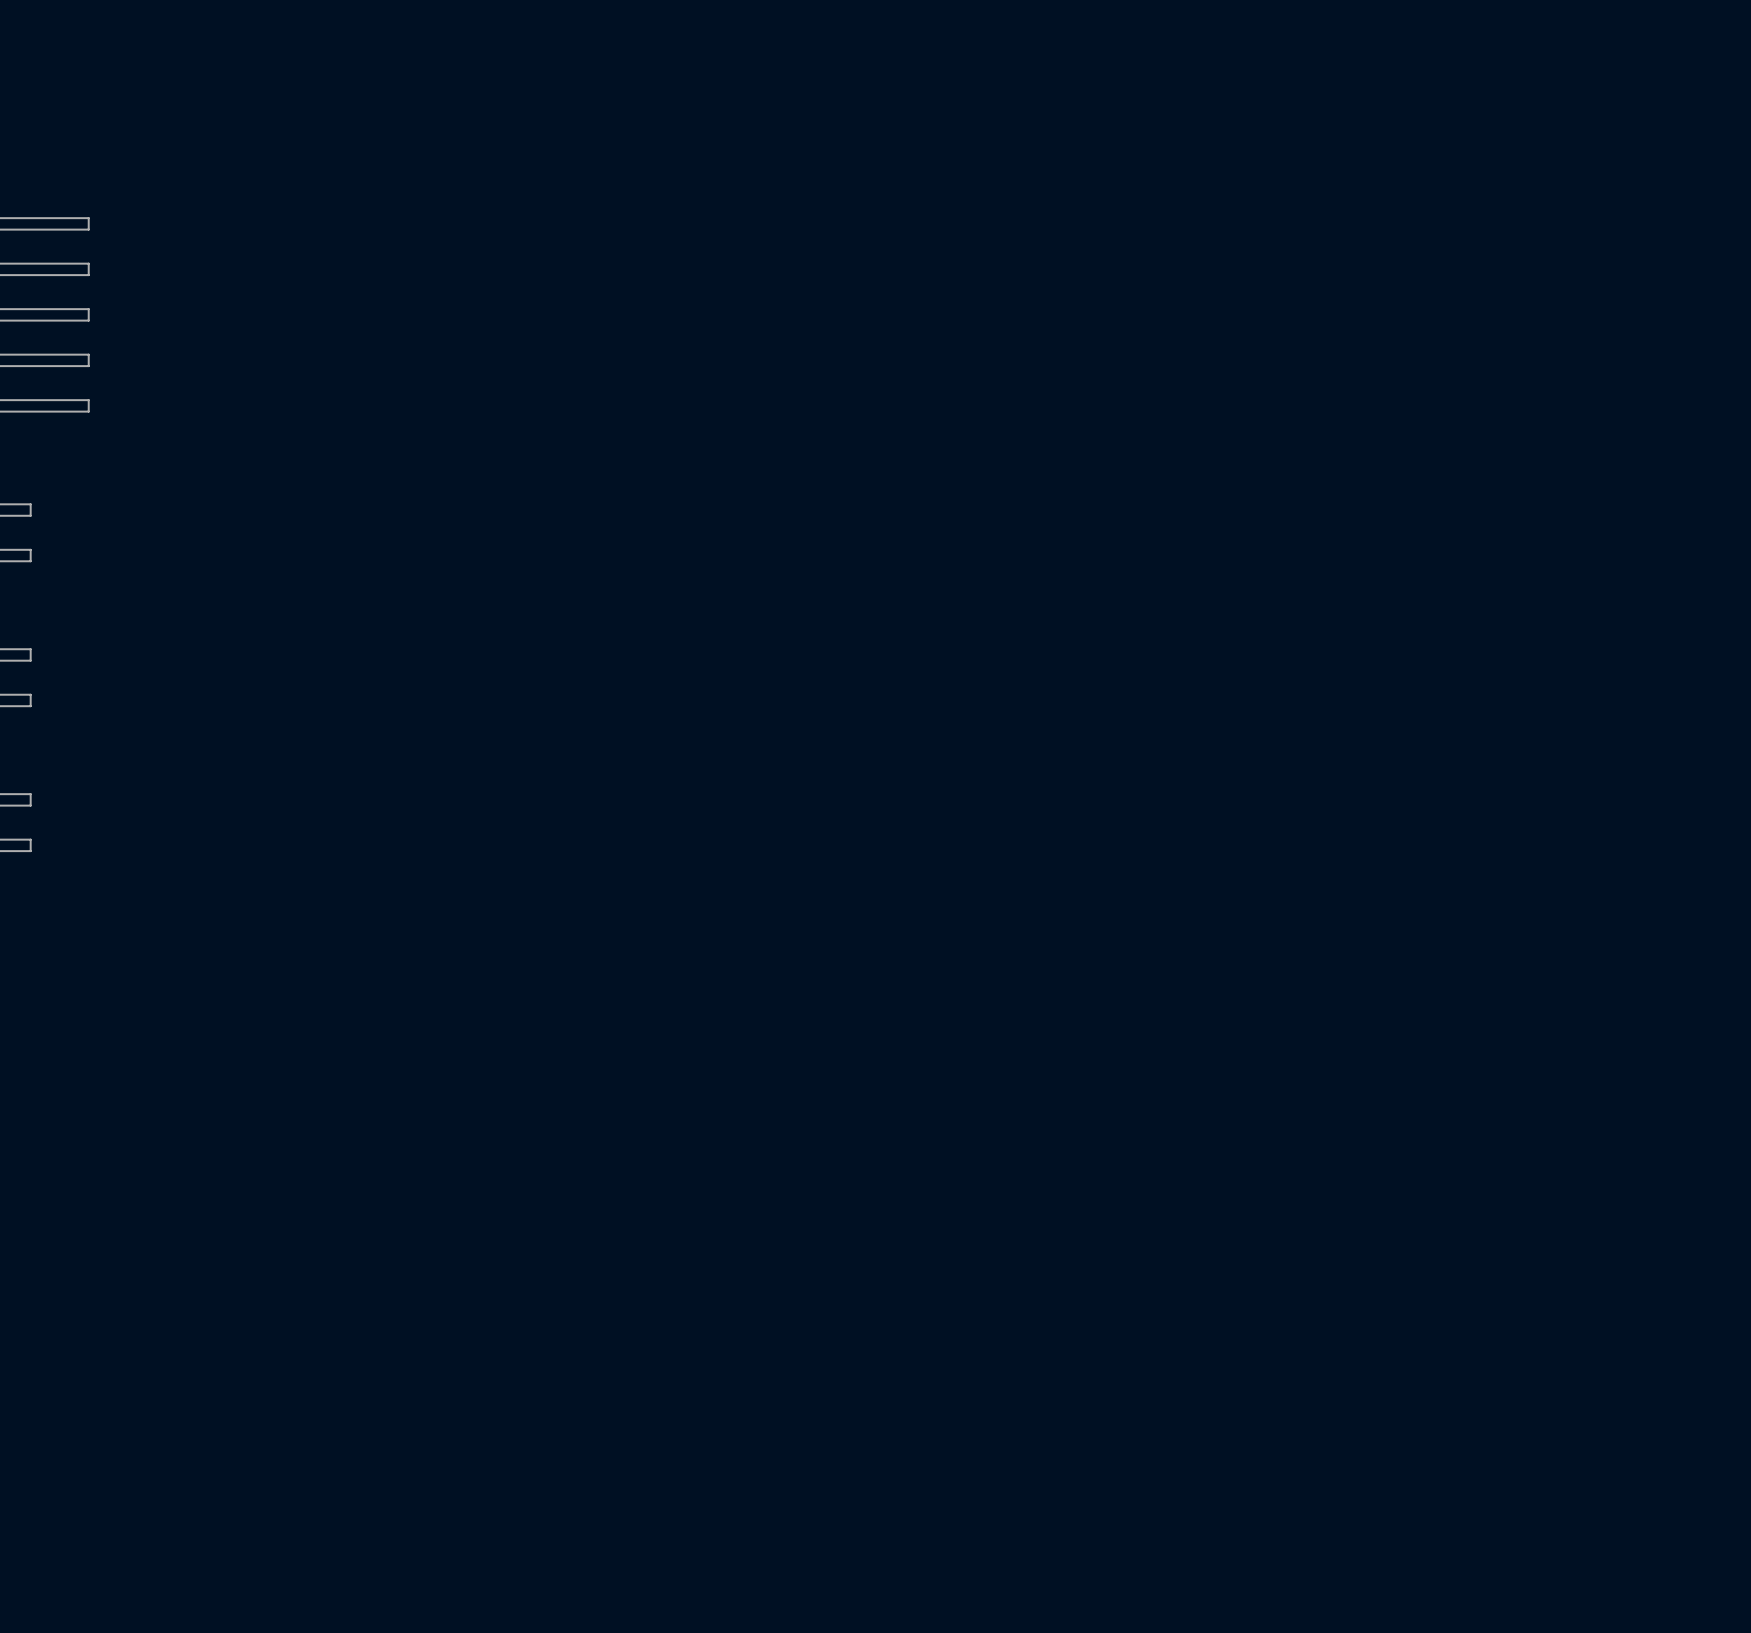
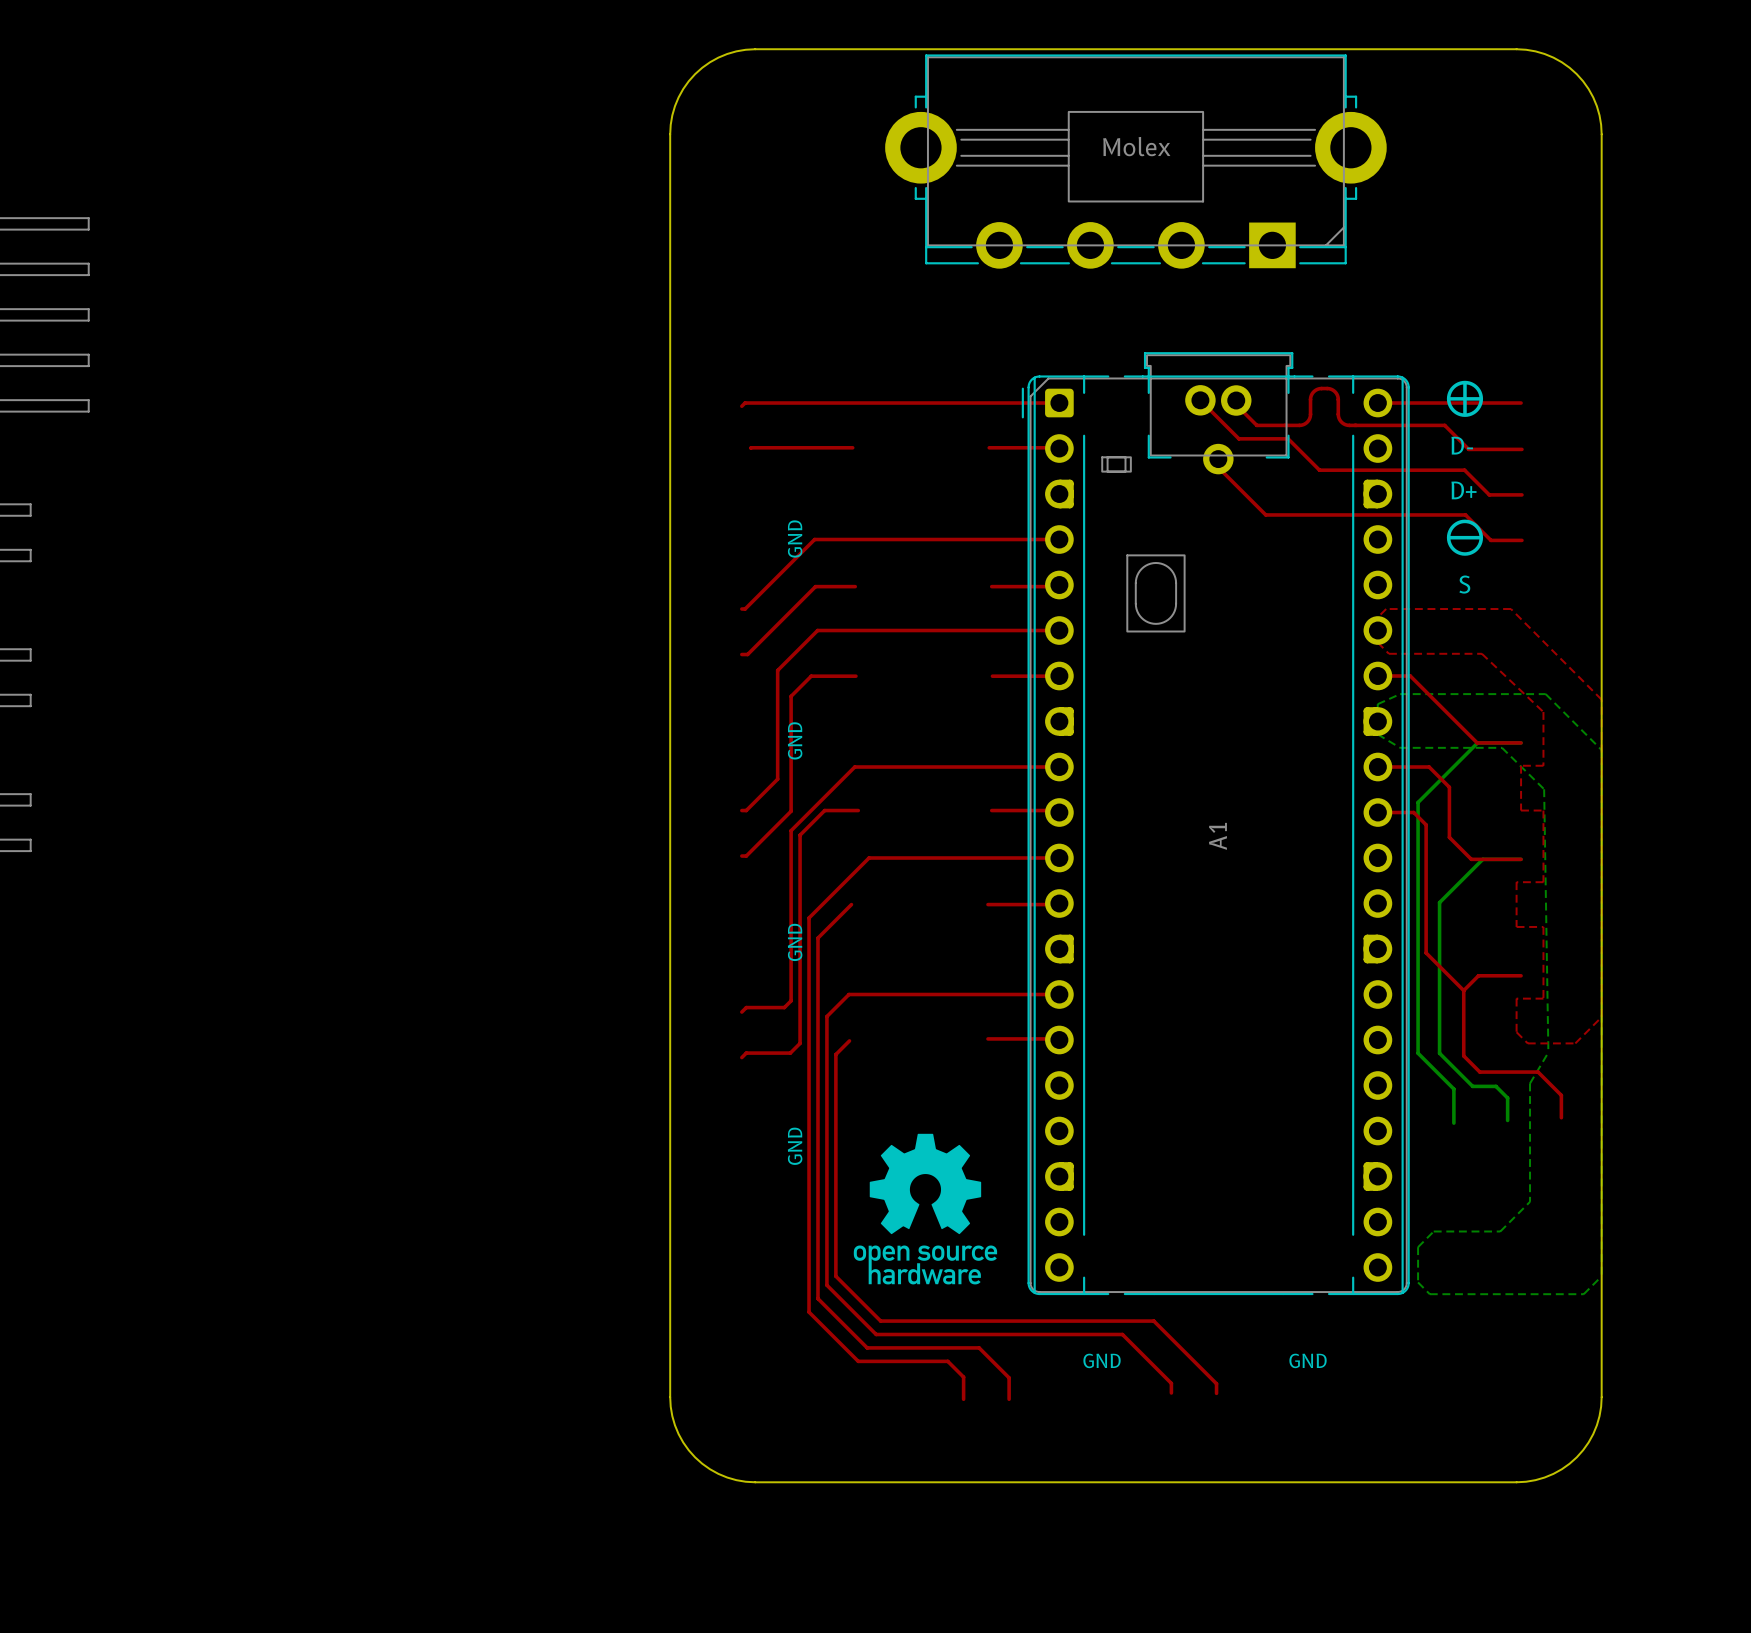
board edge: none -> (755, 49) (1516, 49) (1544, 54) (1561, 62) (1576, 74) (1588, 89) (1596, 106) (1601, 134) (1601, 1397) (1596, 1425) (1588, 1442) (1576, 1457) (1561, 1469) (1535, 1480) (1516, 1482) (755, 1482) (736, 1480) (718, 1473) (702, 1463) (683, 1442) (672, 1416) (670, 1397) (670, 134) (672, 115) (678, 97) (695, 74) (718, 57) (736, 51) (755, 49)
part: none -> (1135, 161)
part: none -> (1200, 400)
part: none -> (1236, 400)
text: none -> ⊕ (1464, 398)
top track: none -> (1055, 403) (745, 403) (741, 406)
top track: none -> (1198, 403) (1203, 403) (1238, 438) (1288, 438) (1319, 470) (1464, 470) (1489, 494) (1521, 494)
top track: none -> (1234, 403) (1256, 425) (1300, 425) (1309, 418) (1310, 398) (1312, 392) (1318, 388) (1328, 388) (1337, 395) (1338, 417) (1346, 425) (1444, 425) (1468, 449) (1521, 449)
top track: none -> (1377, 403) (1521, 403)
text: none -> D- (1462, 445)
top track: none -> (852, 447) (750, 448)
top track: none -> (989, 447) (1059, 448)
part: none -> (1218, 459)
top track: none -> (1216, 465) (1265, 514) (1465, 514) (1490, 540) (1521, 540)
text: none -> D+ (1463, 490)
text: none -> GND (795, 539)
top track: none -> (1059, 539) (814, 539) (745, 609) (741, 609)
text: none -> ⊖ (1464, 537)
text: none -> S (1464, 584)
top track: none -> (1059, 585) (1057, 586) (991, 586)
top track: none -> (855, 586) (815, 586) (747, 654) (741, 654)
top zone outline: none -> (1386, 609) (1510, 609) (1601, 699) (1601, 1017) (1575, 1043) (1527, 1043) (1516, 1032) (1516, 998) (1543, 998) (1543, 926) (1516, 926) (1516, 882) (1543, 882) (1543, 810) (1521, 810) (1521, 765) (1543, 765) (1543, 712) (1481, 653) (1388, 653) (1377, 642) (1377, 617) (1386, 609)
top track: none -> (1055, 630) (817, 630) (777, 670) (777, 779) (746, 810) (741, 810)
top track: none -> (855, 676) (811, 676) (791, 696) (791, 811) (746, 856) (741, 856)
top track: none -> (992, 676) (1059, 676)
top track: none -> (1377, 676) (1410, 676) (1477, 742) (1521, 742)
bottom zone outline: none -> (1400, 694) (1545, 694) (1601, 750) (1601, 1276) (1583, 1294) (1429, 1294) (1418, 1282) (1418, 1247) (1433, 1231) (1500, 1231) (1530, 1201) (1530, 1083) (1548, 1052) (1544, 789) (1502, 747) (1400, 747) (1377, 734) (1377, 704) (1400, 694)
text: none -> GND (795, 740)
bottom track: none -> (1521, 742) (1477, 742) (1418, 802) (1418, 1053) (1453, 1089) (1453, 1123)
top track: none -> (1055, 767) (854, 767) (791, 830) (791, 1000) (784, 1007) (746, 1007) (741, 1012)
top track: none -> (1377, 767) (1429, 767) (1449, 787) (1449, 837) (1471, 859) (1521, 859)
top track: none -> (858, 810) (824, 810) (800, 835) (800, 1043) (790, 1053) (746, 1053) (741, 1057)
top track: none -> (991, 810) (1057, 810)
top track: none -> (1377, 812) (1413, 812) (1426, 824) (1426, 952) (1463, 990)
A1: none -> (1215, 823)
top track: none -> (1055, 858) (869, 858) (809, 918) (809, 1312) (858, 1361) (947, 1361) (963, 1377) (963, 1399)
bottom track: none -> (1521, 859) (1482, 859) (1439, 902) (1439, 1053) (1472, 1086) (1495, 1086) (1507, 1098) (1507, 1120)
top track: none -> (851, 904) (817, 938) (817, 1298) (867, 1347) (979, 1347) (1009, 1377) (1009, 1399)
top track: none -> (987, 904) (1058, 904)
text: none -> GND (795, 942)
top track: none -> (1521, 975) (1478, 975) (1463, 990)
top track: none -> (1463, 990) (1463, 1055) (1479, 1072) (1538, 1072) (1561, 1095) (1561, 1117)
top track: none -> (1059, 994) (848, 994) (826, 1016) (826, 1285) (876, 1334) (1122, 1334) (1171, 1383) (1171, 1392)
top track: none -> (987, 1038) (1058, 1038)
top track: none -> (849, 1040) (835, 1054) (835, 1276) (880, 1321) (1153, 1321) (1216, 1383) (1216, 1393)
drawing: none -> [853, 1133, 998, 1285]
text: none -> GND (795, 1146)
text: none -> GND (1102, 1360)
text: none -> GND (1308, 1360)

